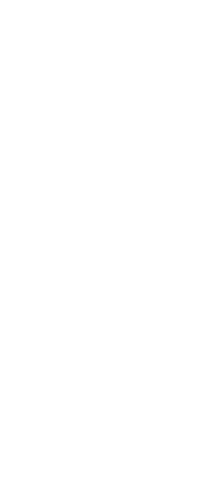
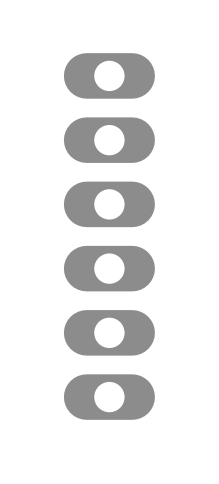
part: none -> (109, 236)

